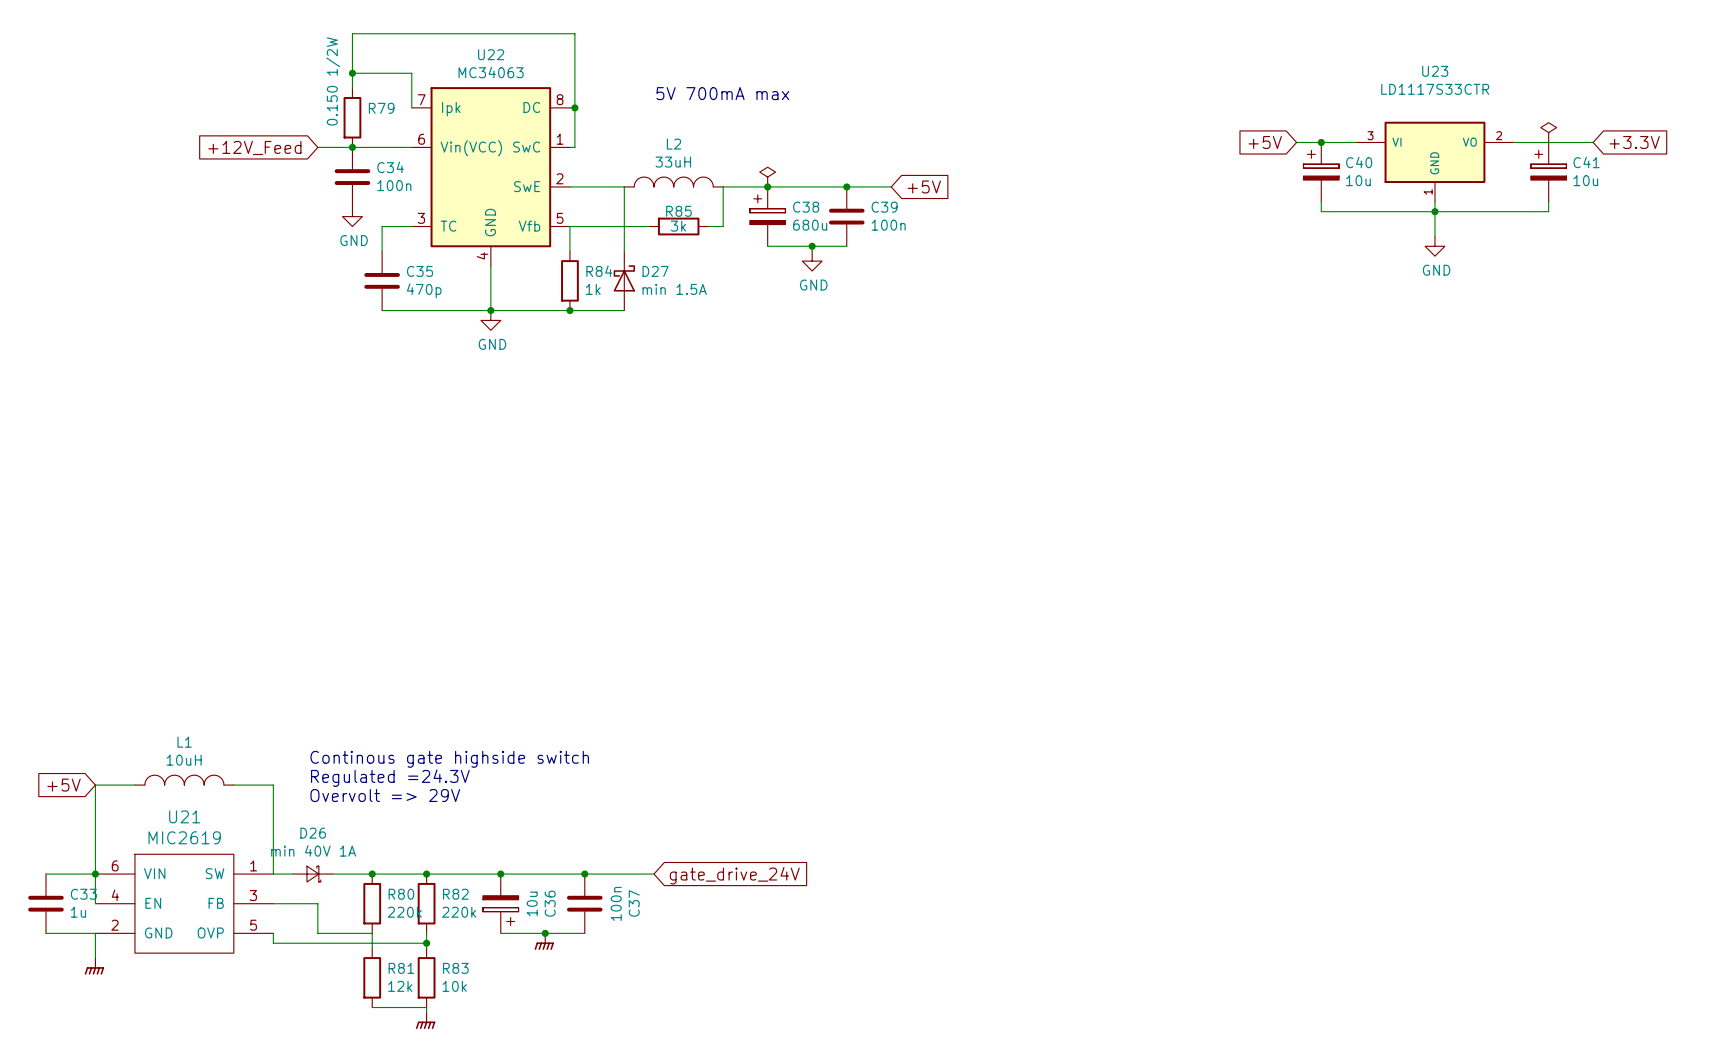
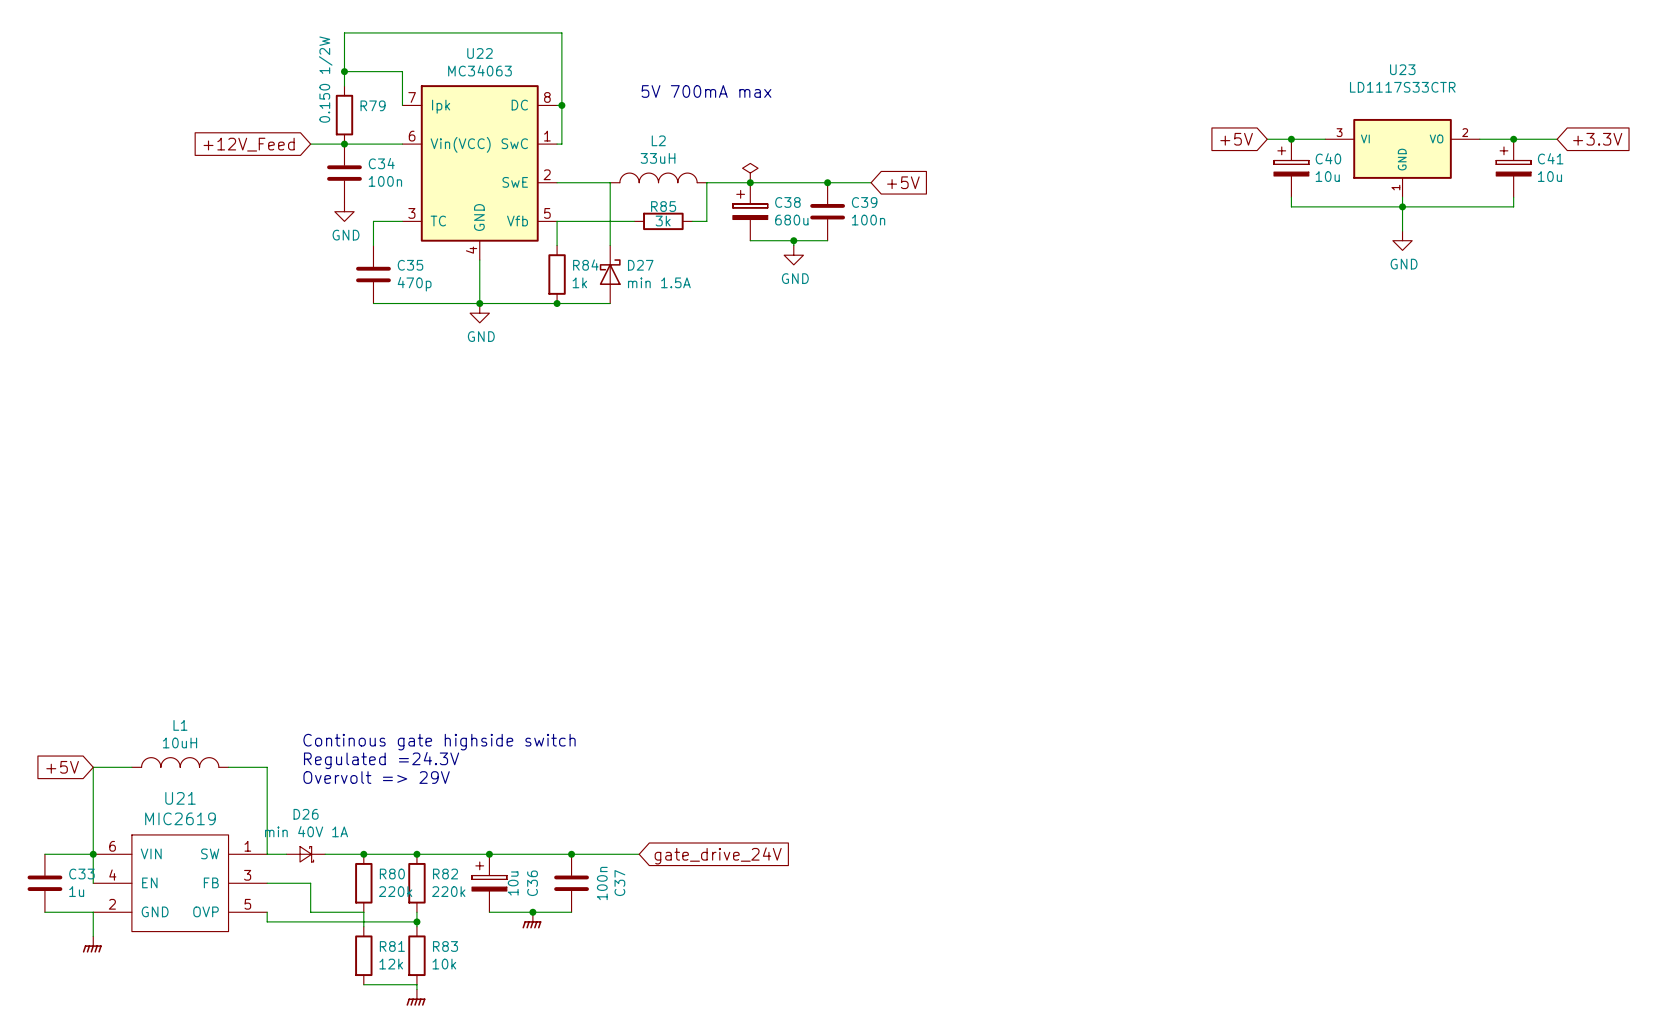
power symbol: (1548, 132) -> none
junction: none -> (1513, 139)
C36 rotation: 0° (500, 910) -> 180° (489, 876)

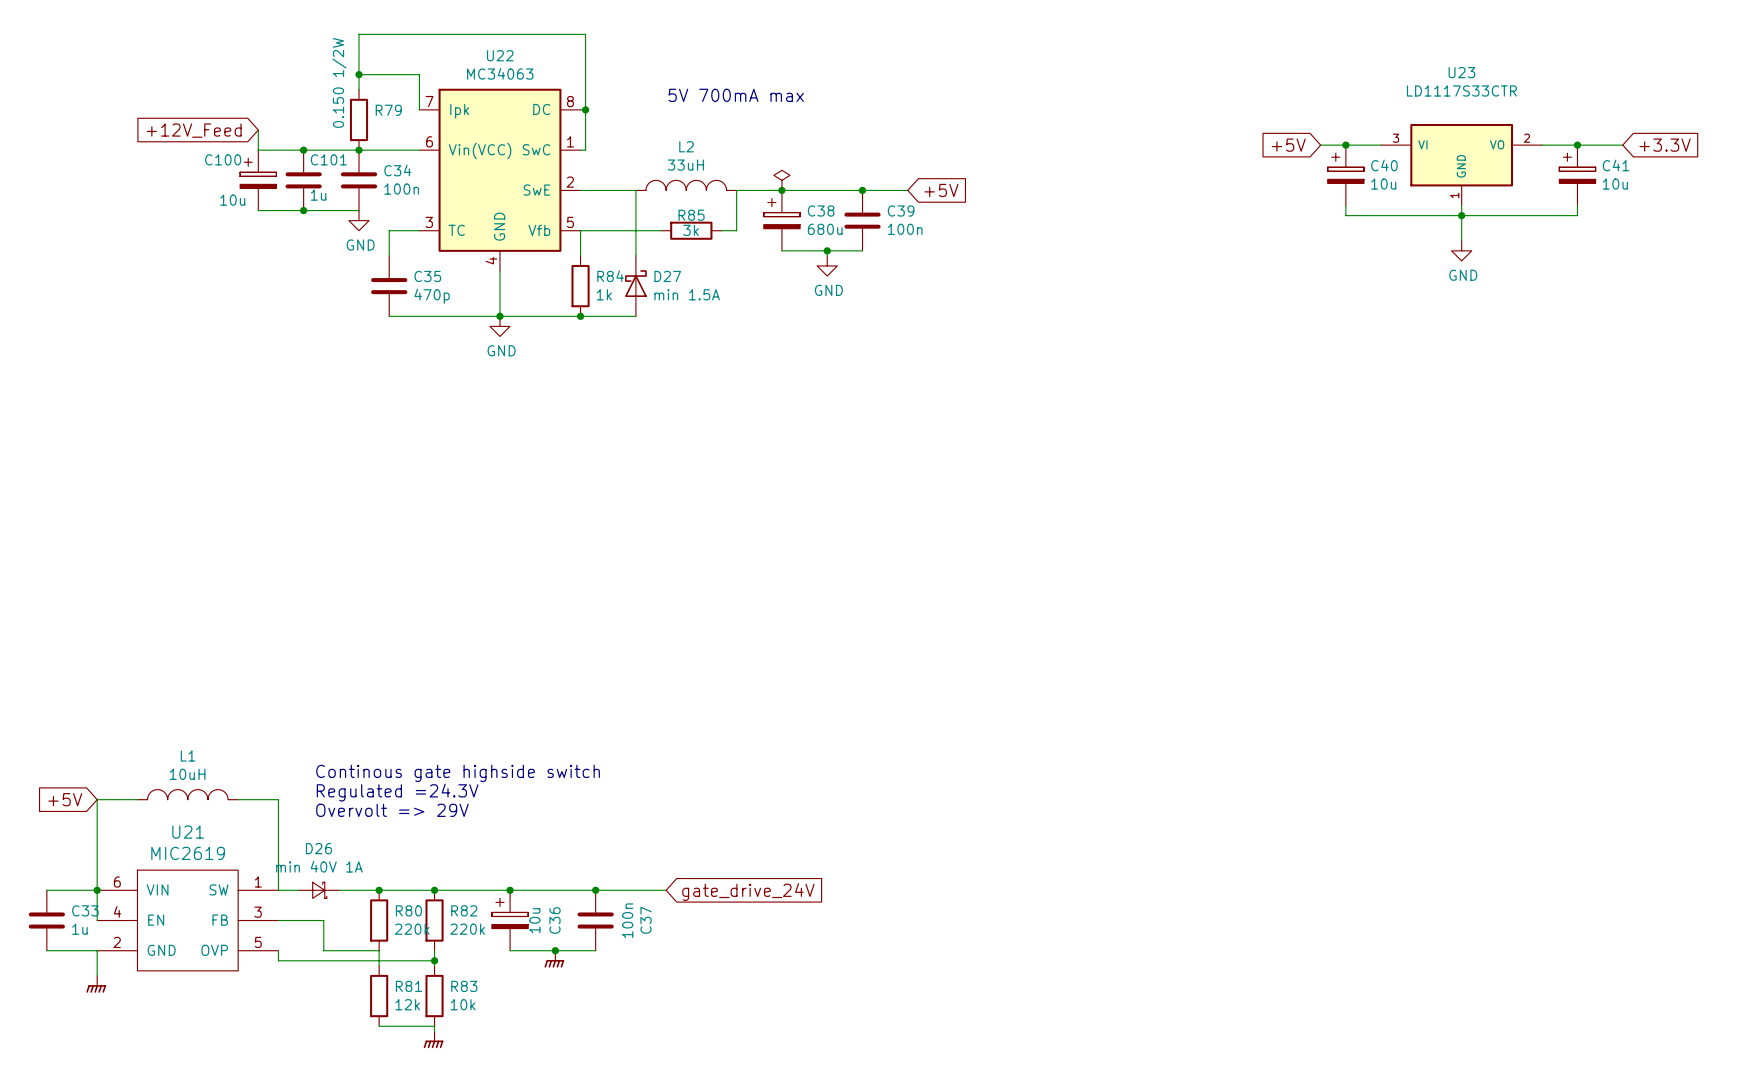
wire: none -> (258, 130) (258, 150) (323, 150)
global label position: +12V_Feed (249, 144) -> +12V_Feed (194, 130)
junction: none -> (303, 150)
C100: none -> 10u (258, 180)
C101: none -> 1u (303, 180)
wire: none -> (258, 210) (359, 210)
junction: none -> (303, 210)

